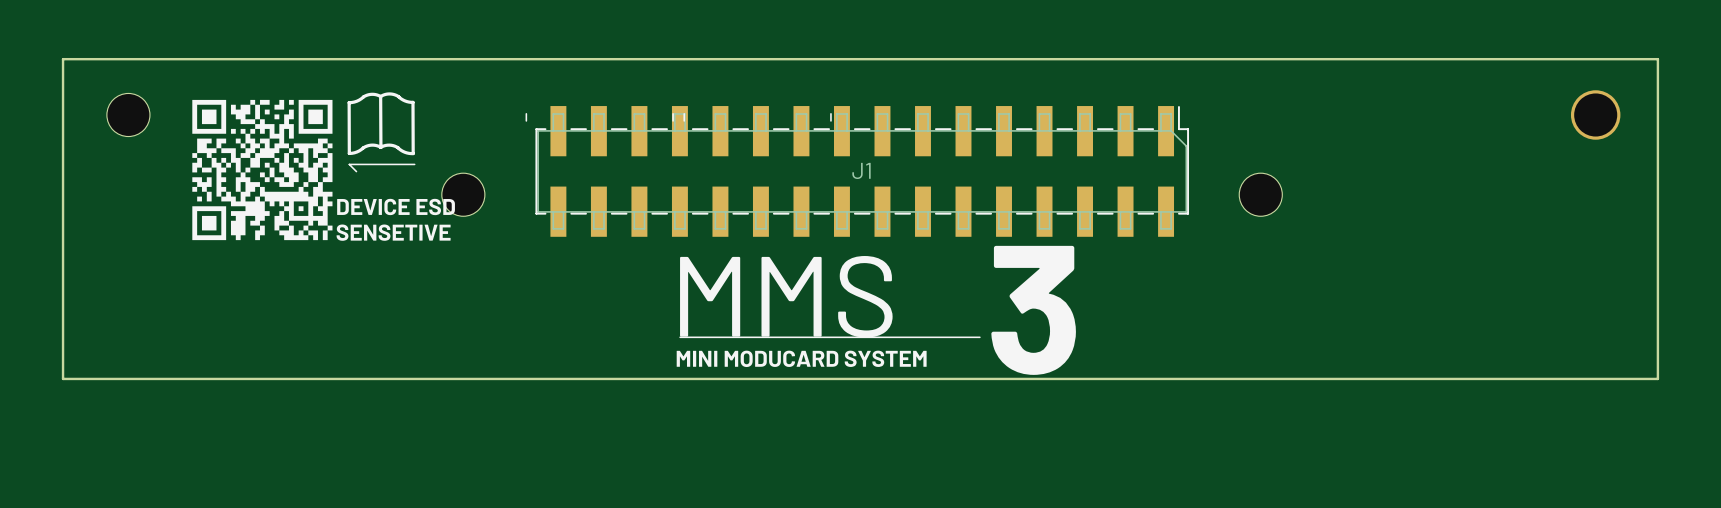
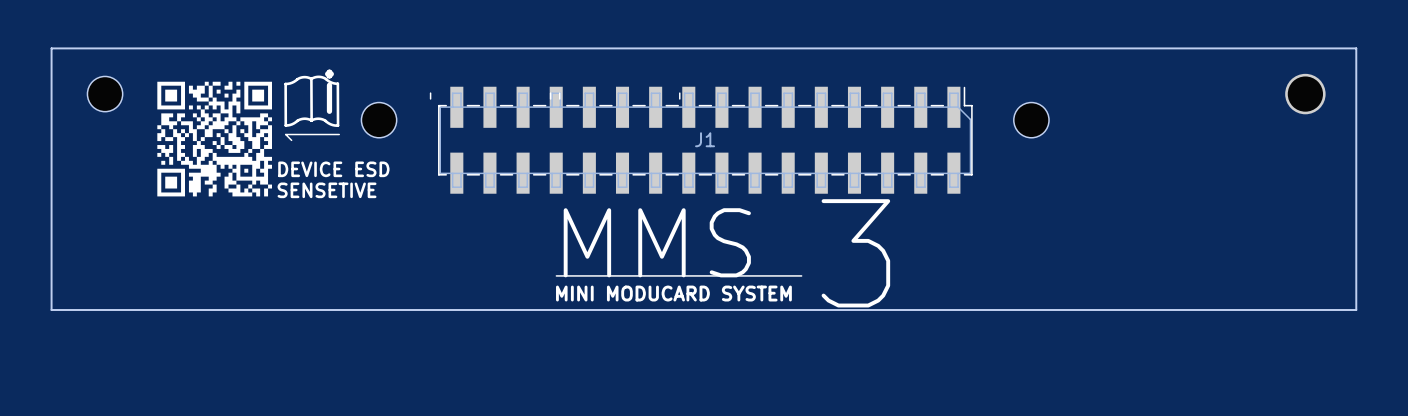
text: none -> i (329, 91)
part position: (463, 194) -> (379, 120)
part position: (1260, 194) -> (1031, 120)

